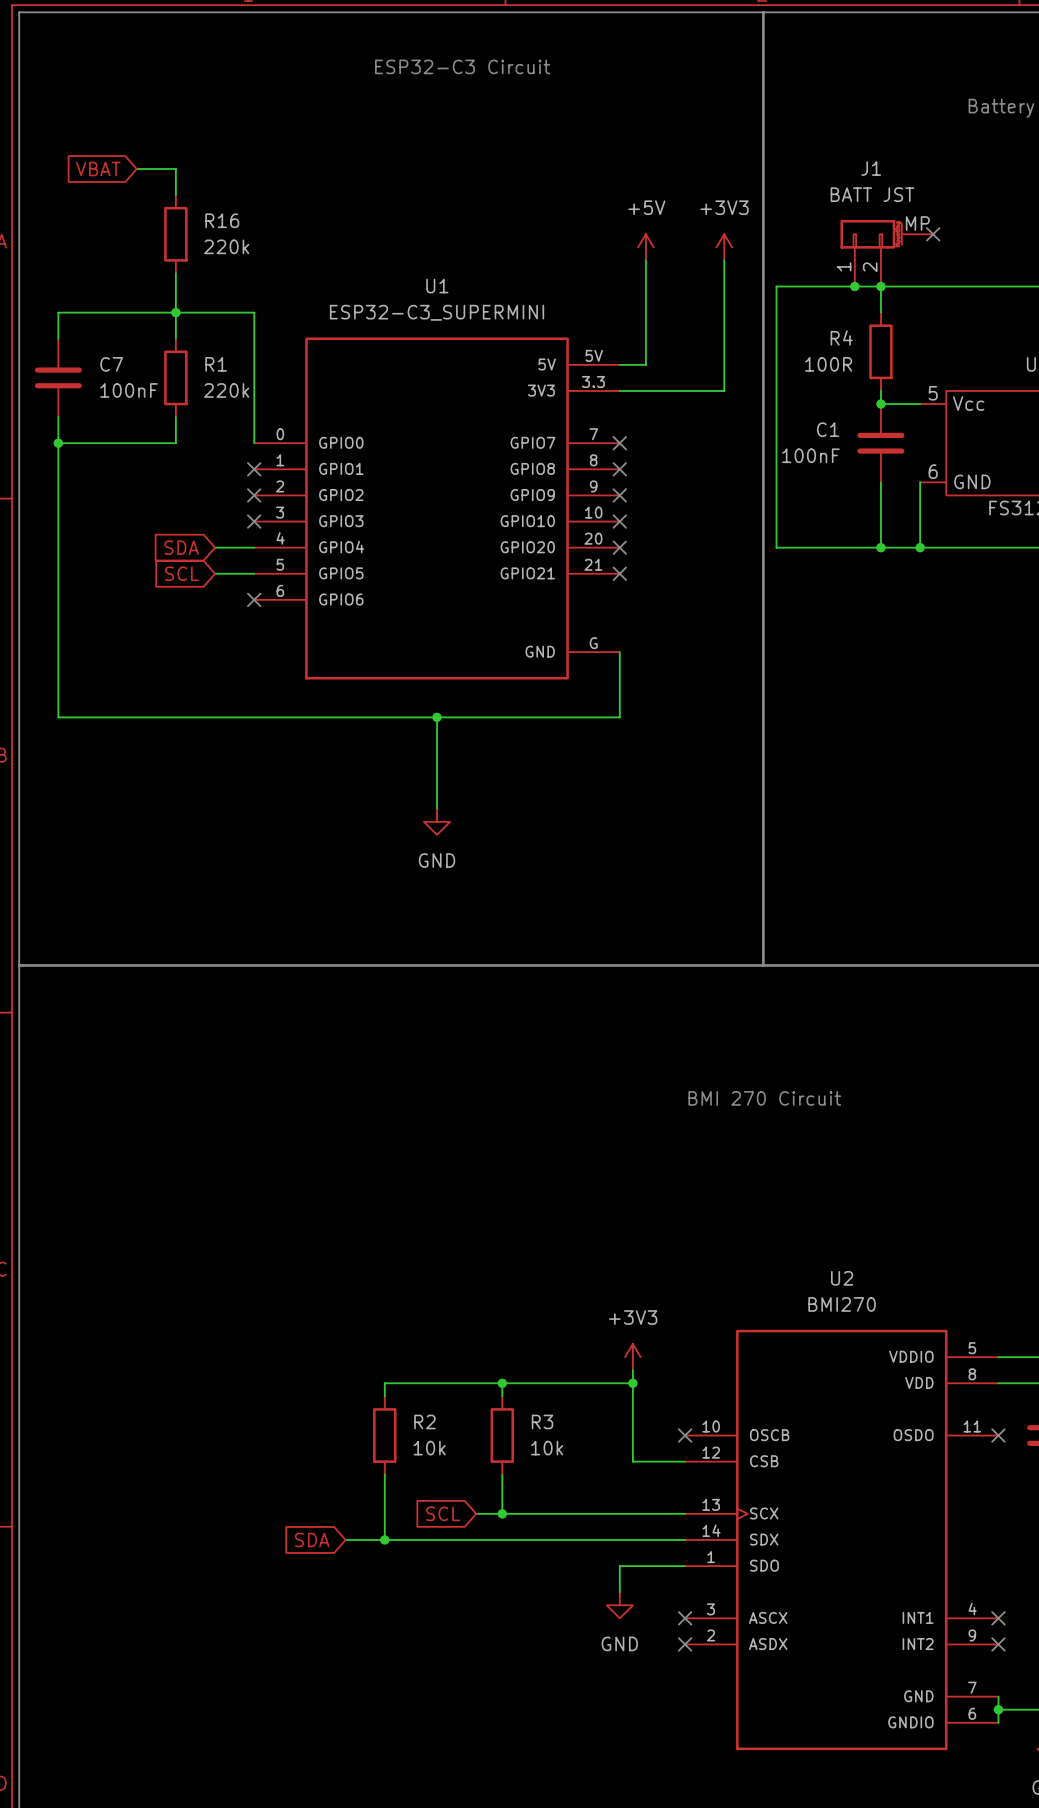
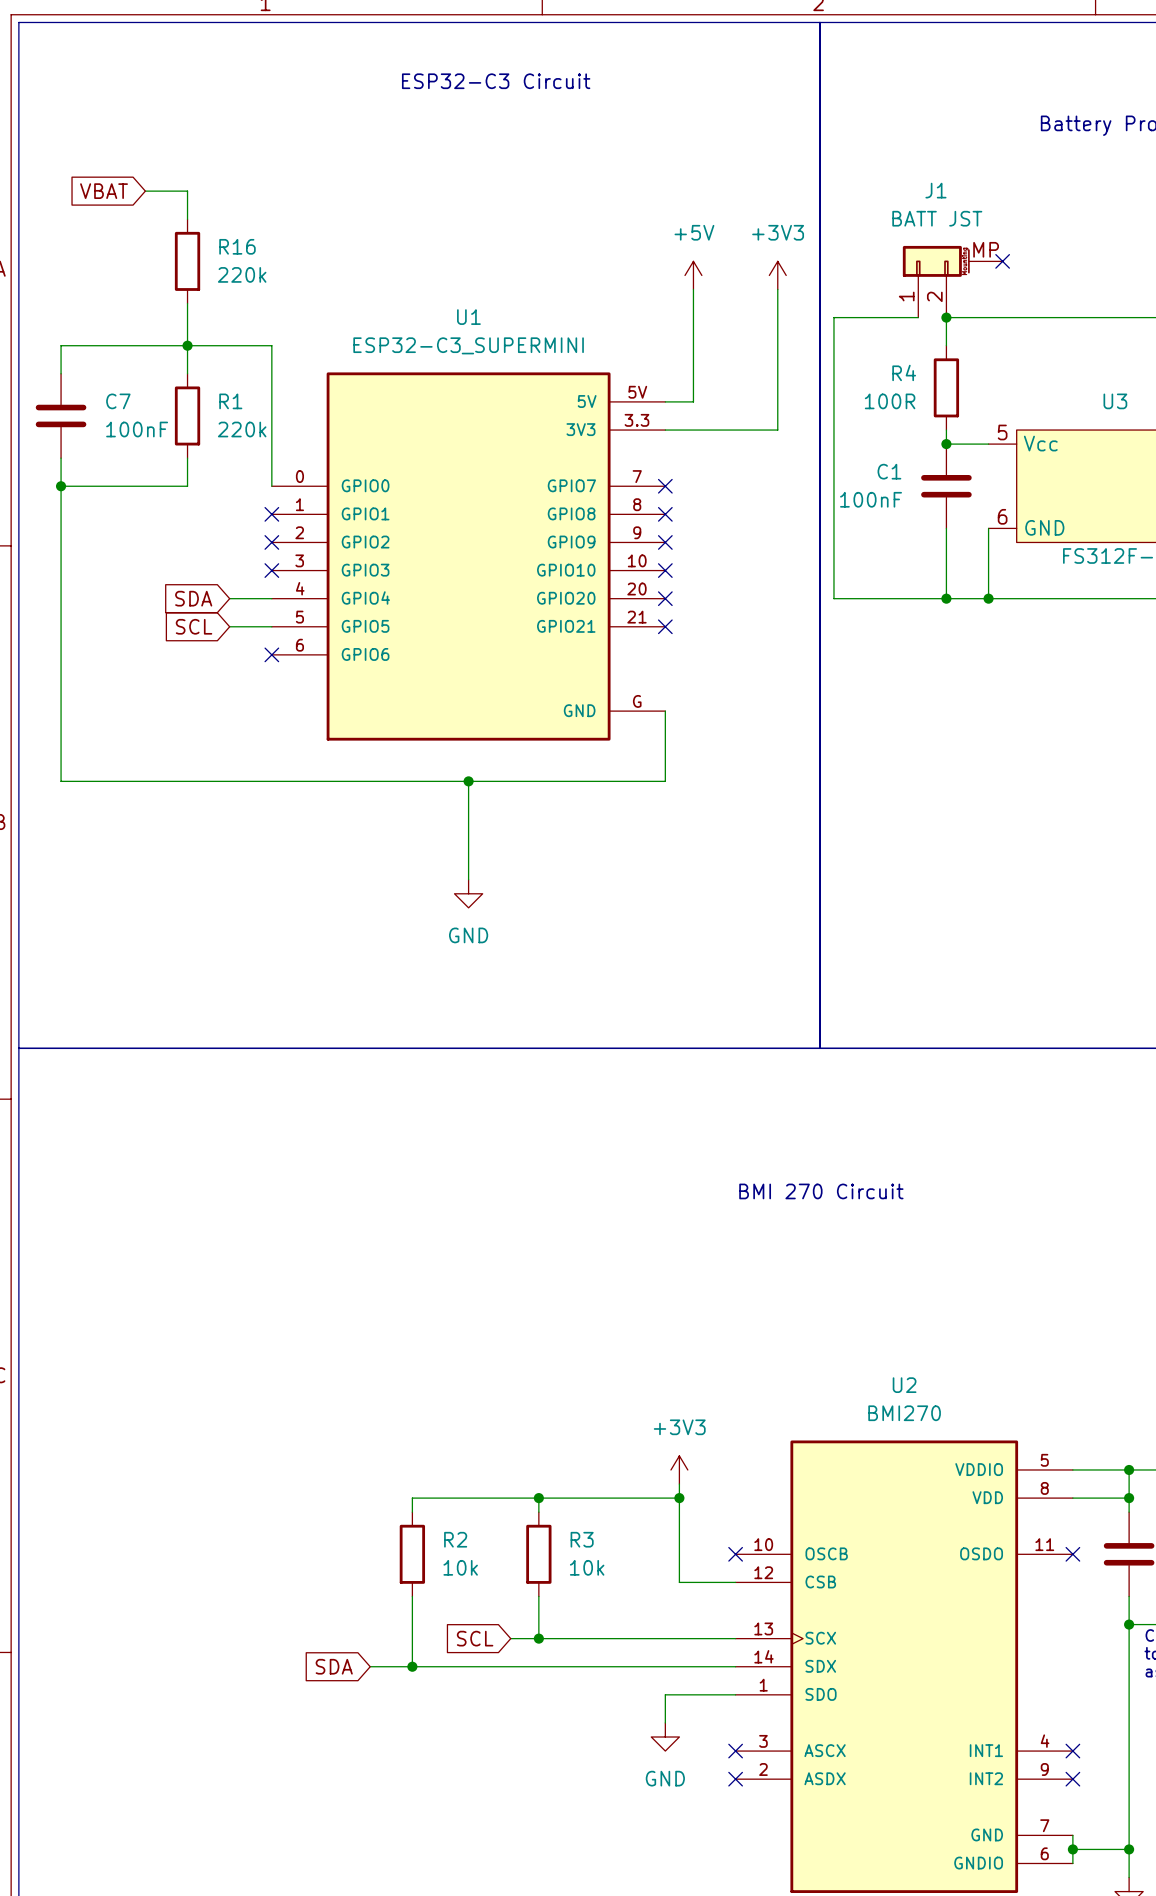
wire: (854, 286) (880, 286) -> none
junction: (854, 286) -> none

